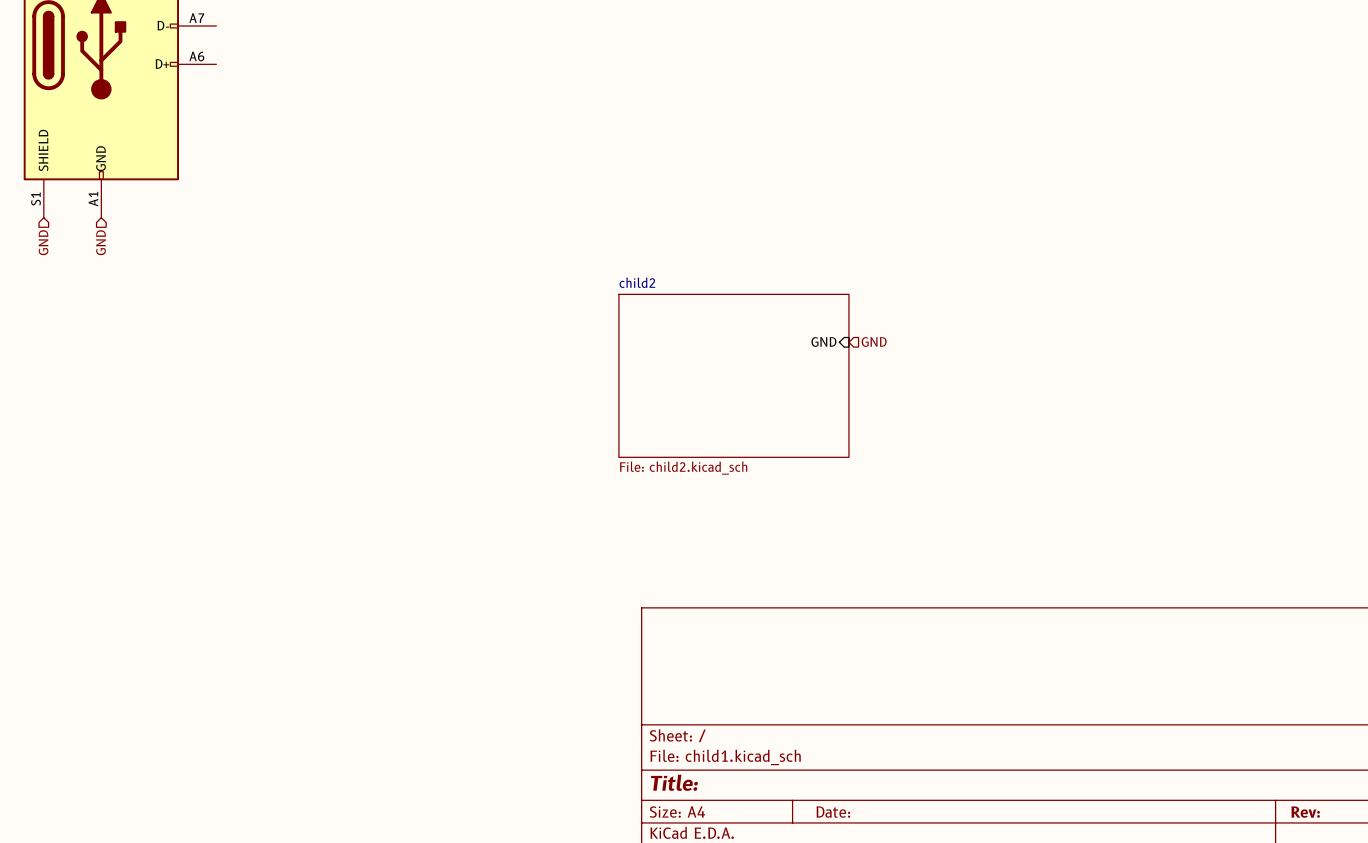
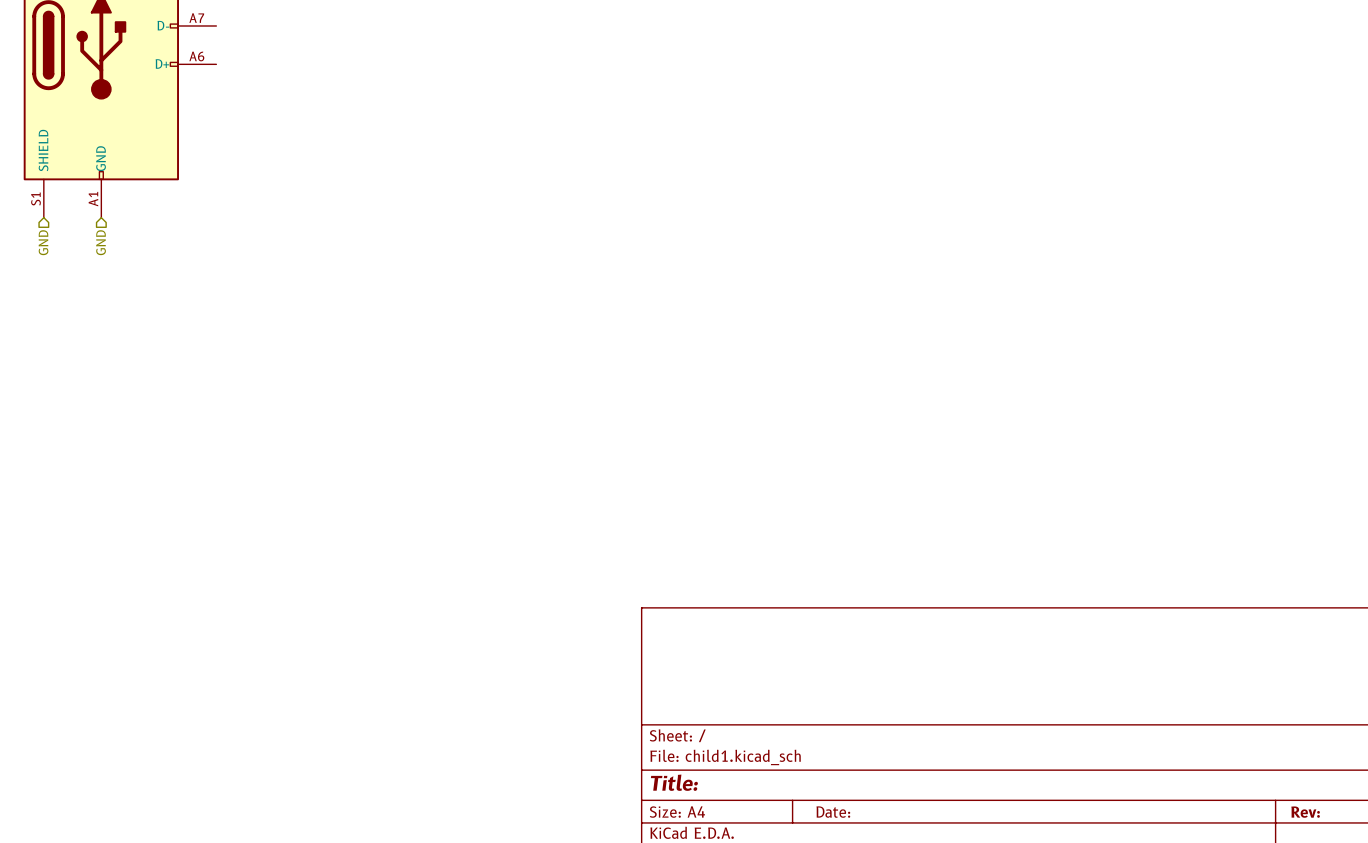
sheet pin: GND (823, 341) -> none
hierarchical label: GND (874, 341) -> none
sheet child2: File: child2.kicad_sch (733, 375) -> none

